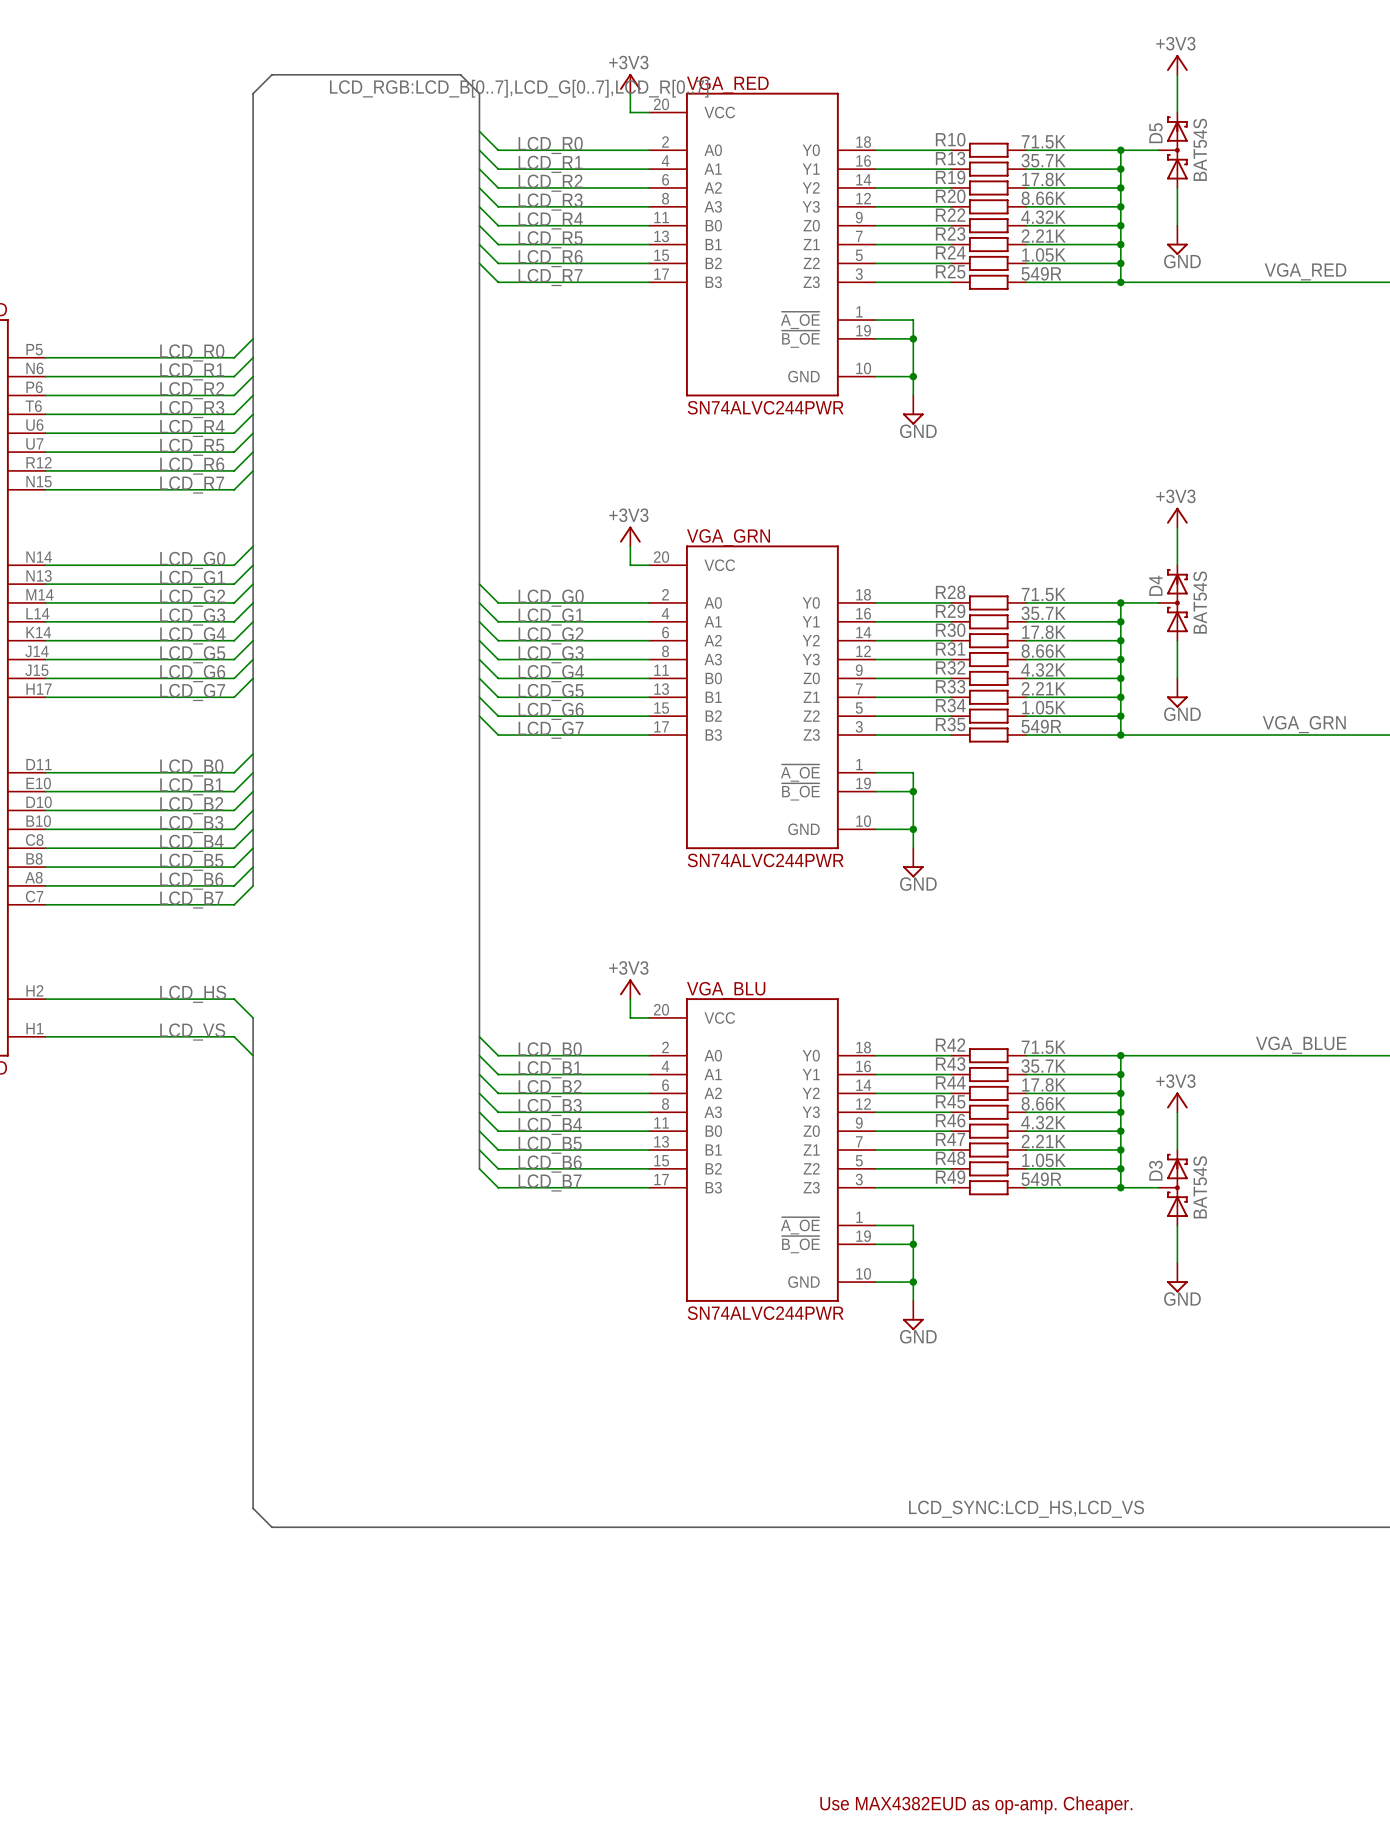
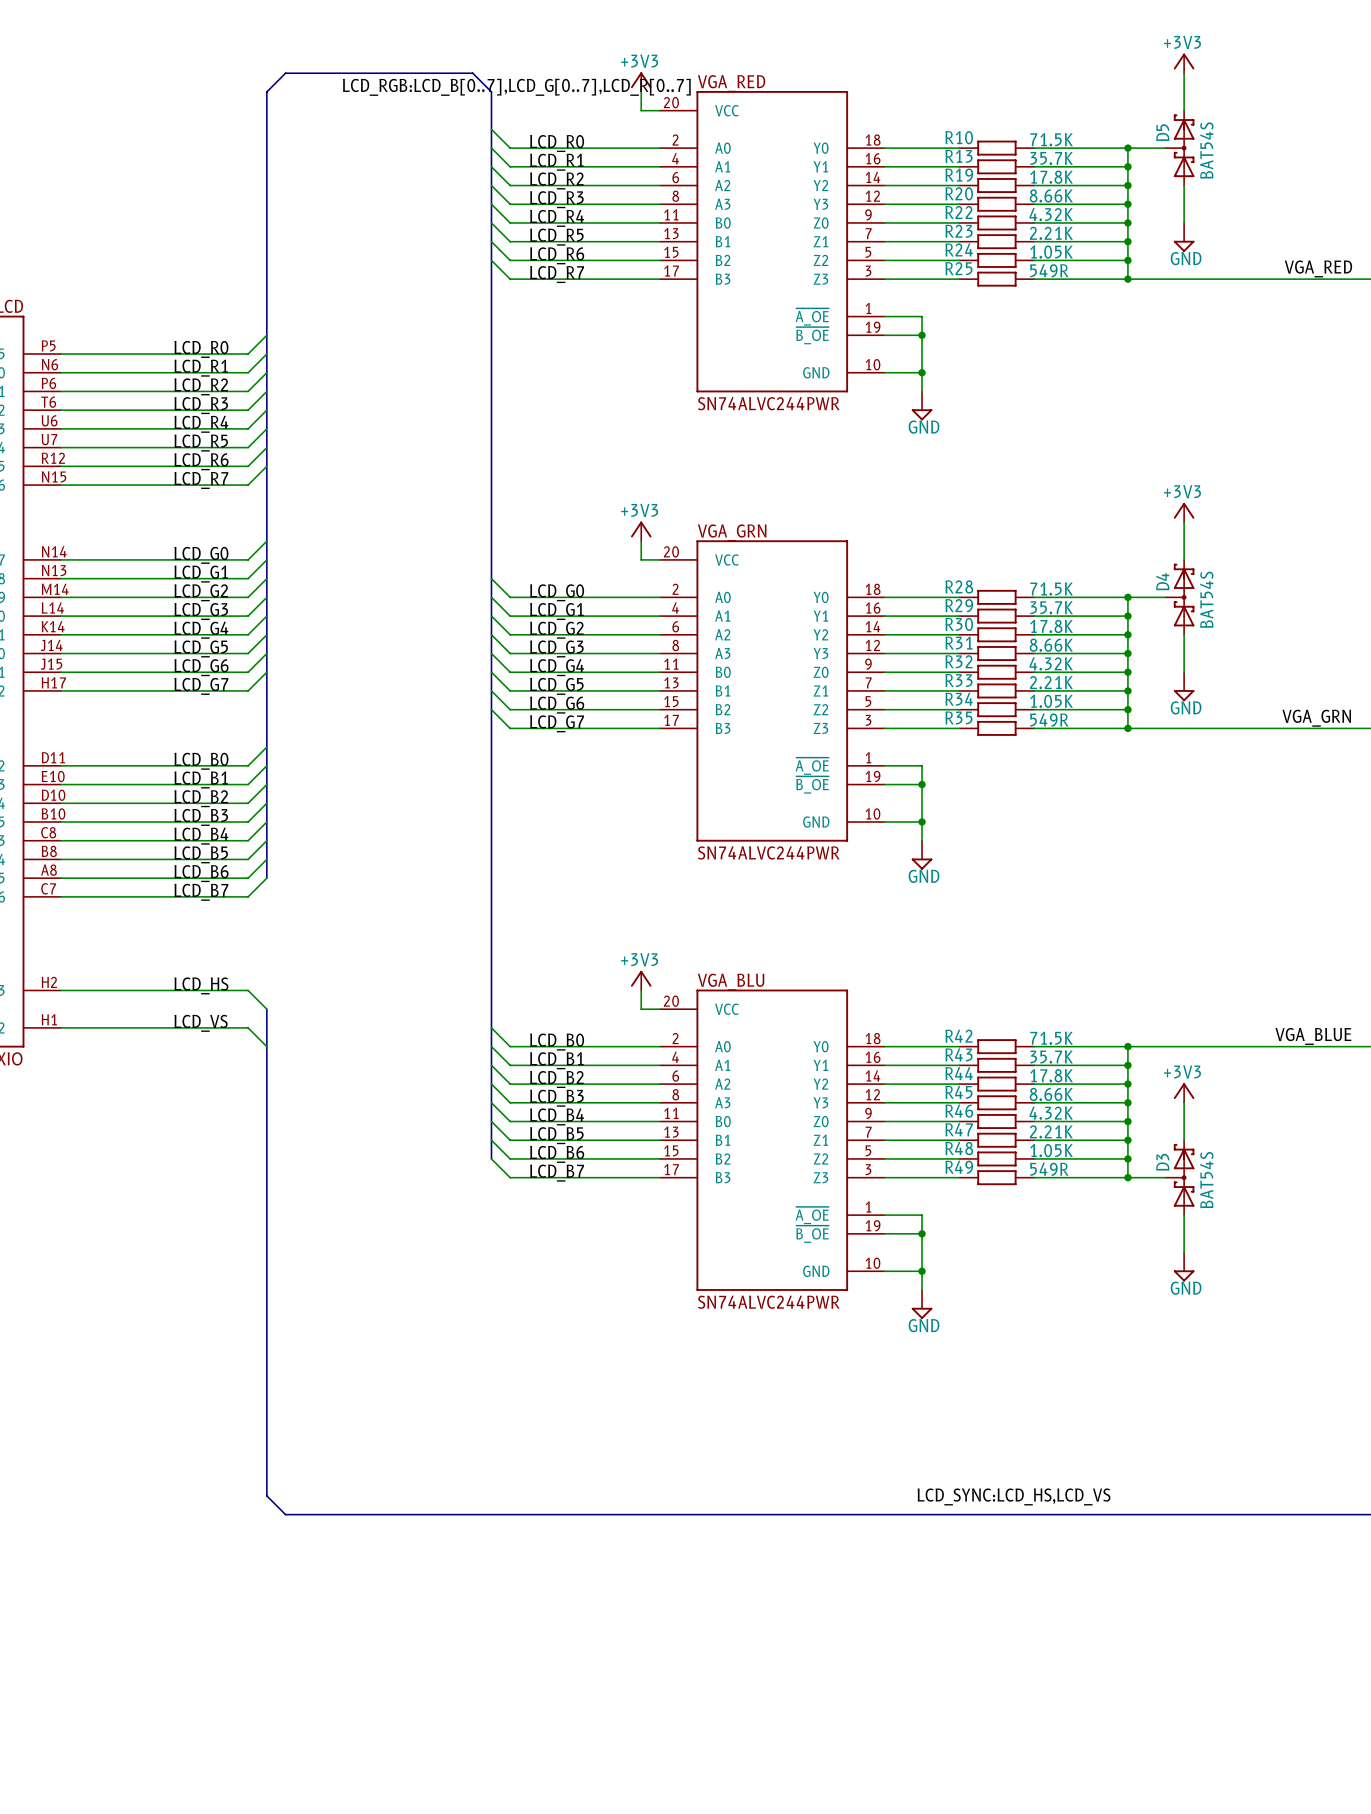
text: Use MAX4382EUD as op-amp. Cheaper. (976, 1805) -> none

